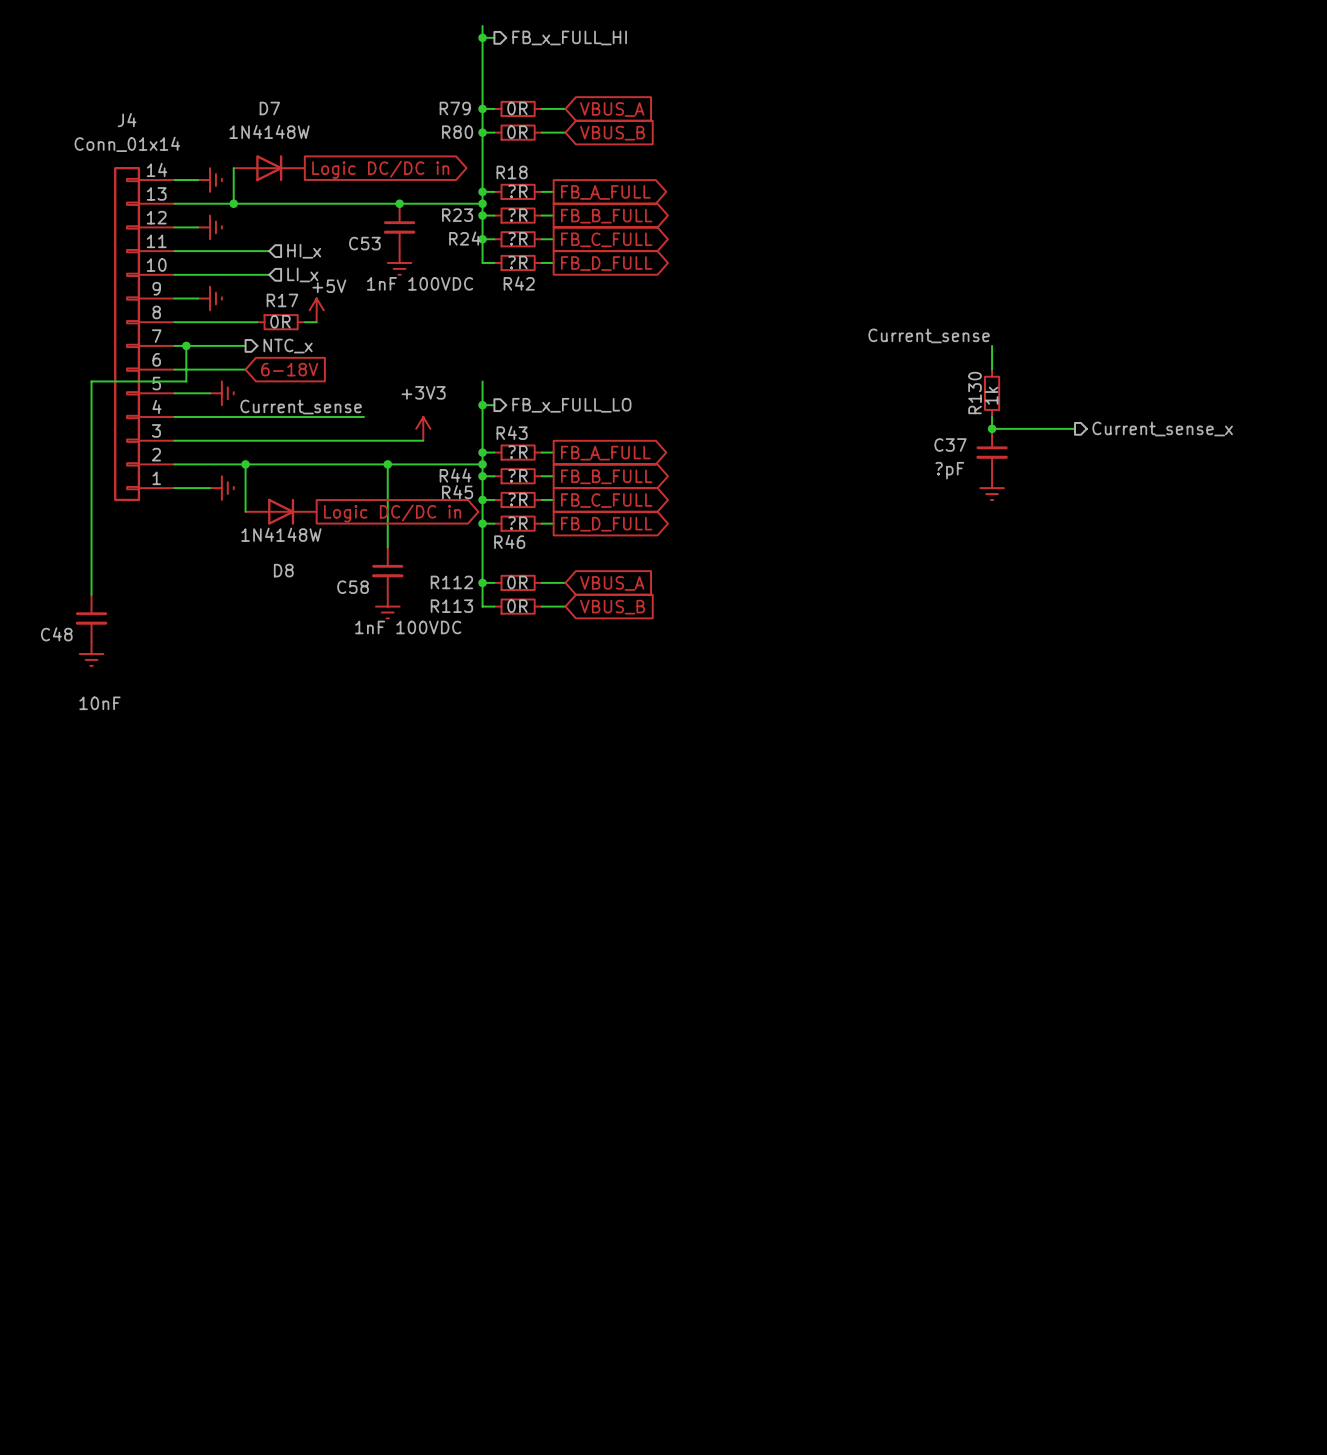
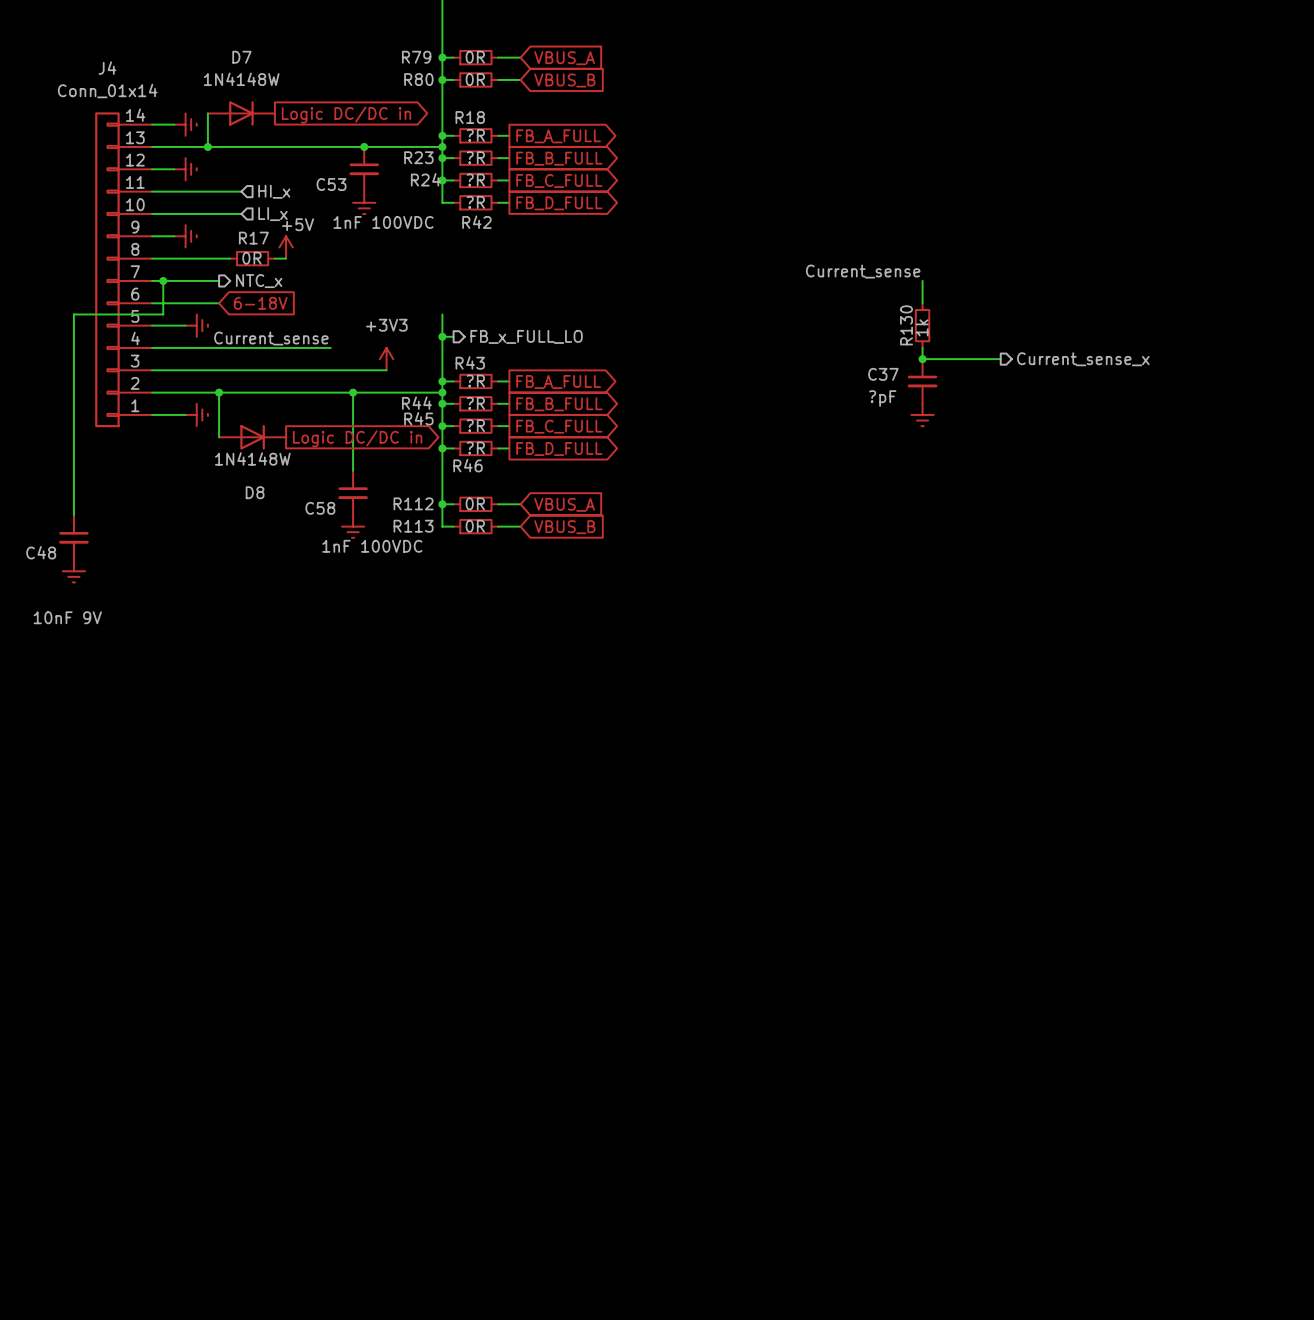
C48 value: 10nF (99, 703) -> 10nF 9V (67, 617)

